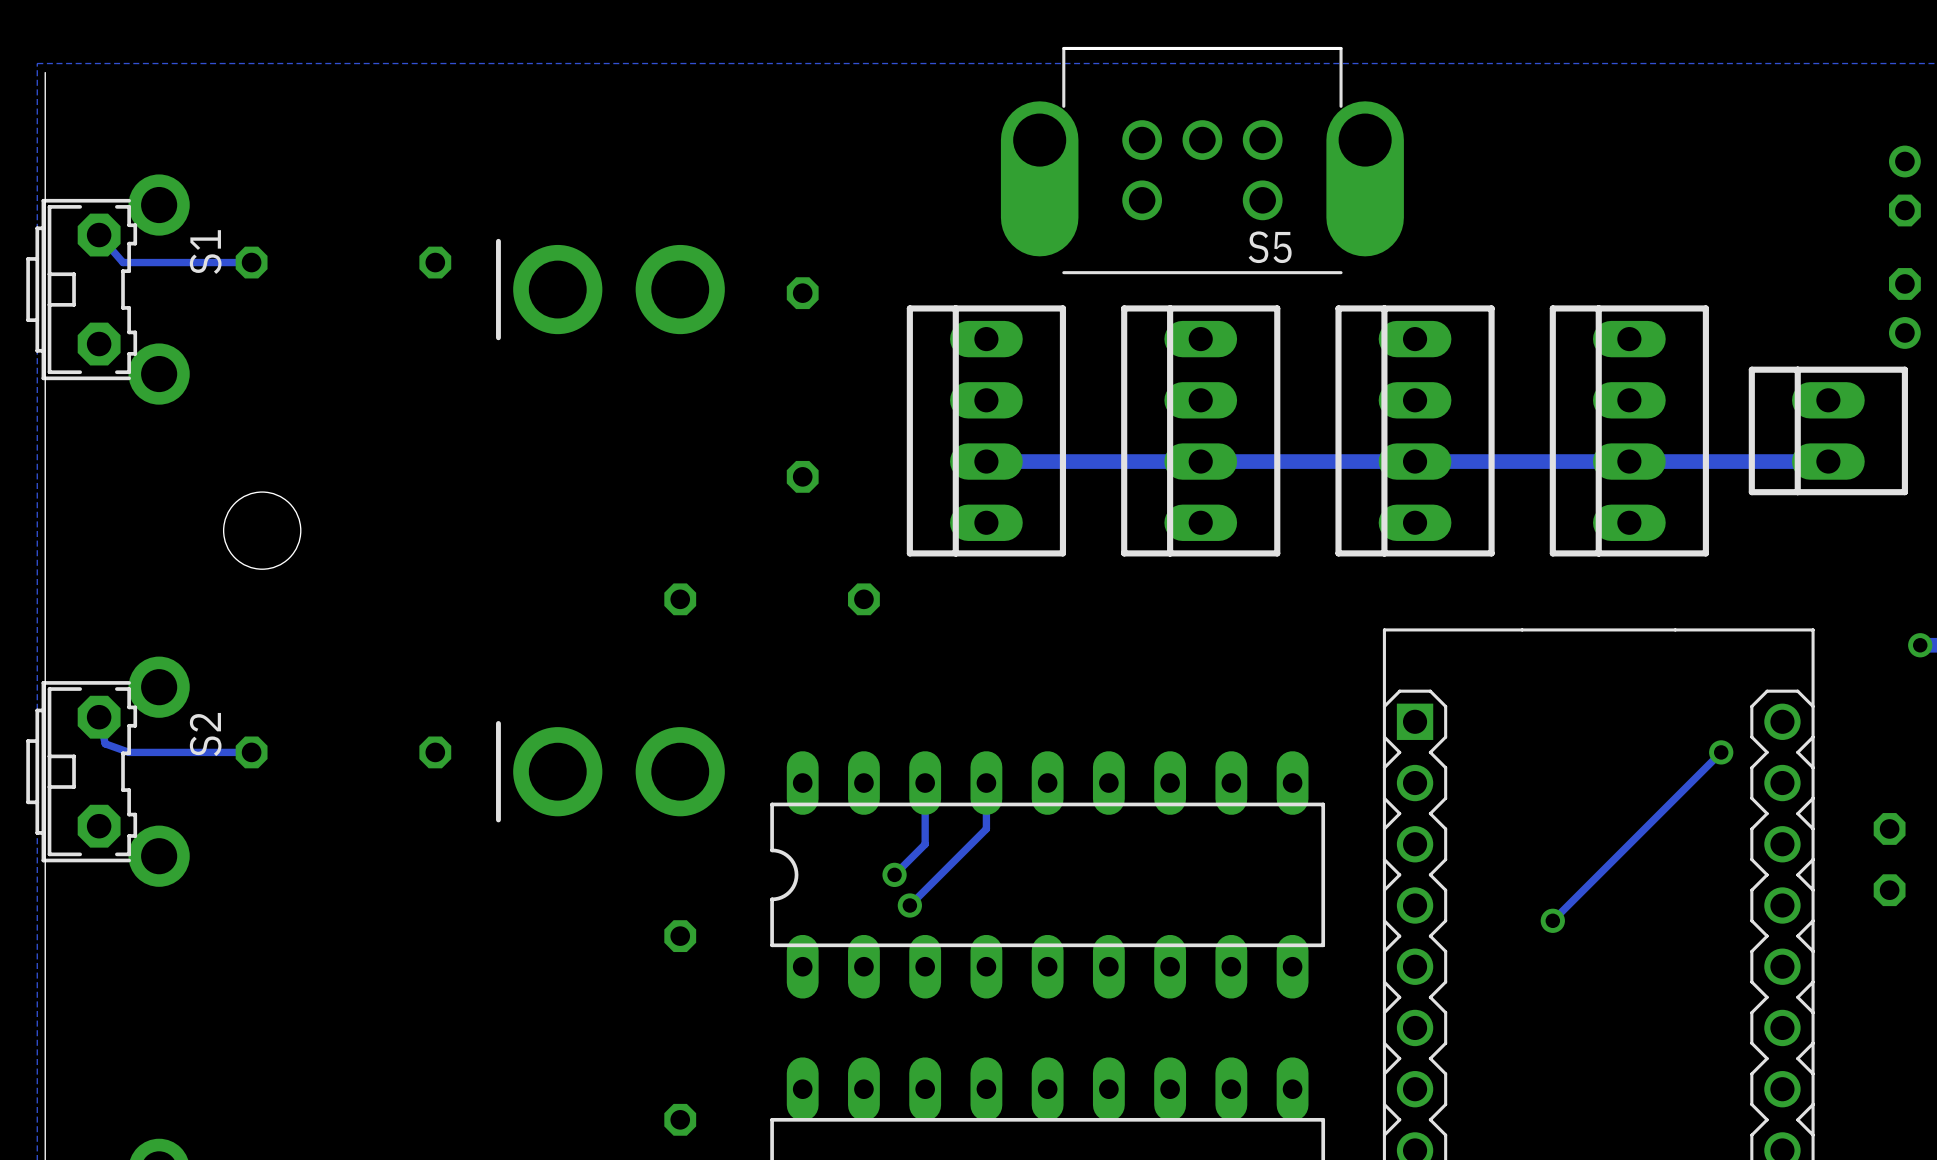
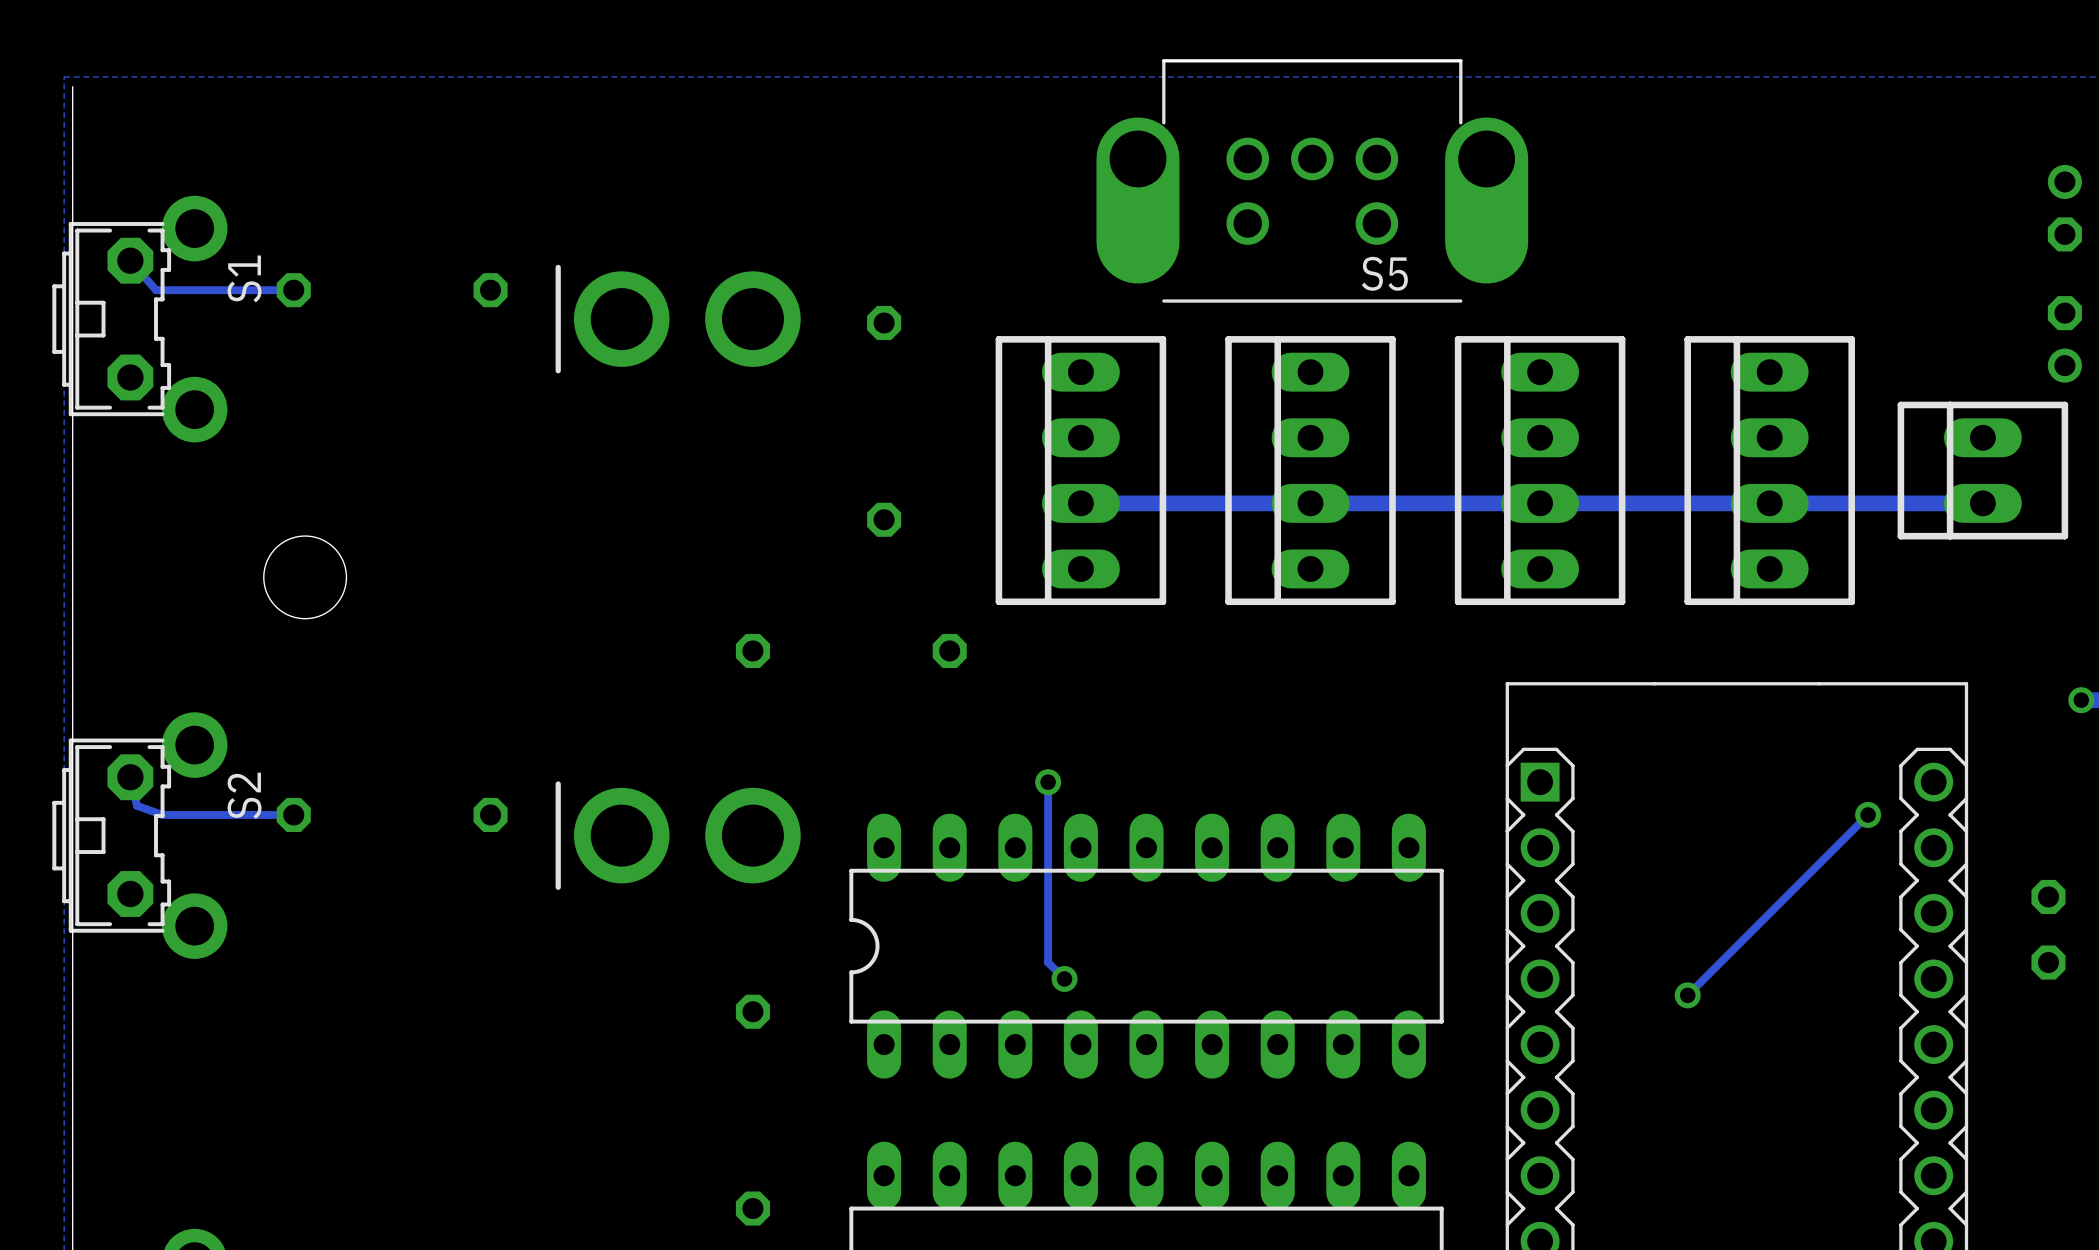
track: none -> (1048, 782) (1048, 962) (1064, 978)
via: none -> (1048, 782)
track: (925, 783) (925, 844) (894, 874) -> none
track: (986, 783) (986, 828) (909, 905) -> none
via: (894, 874) -> none
via: (909, 905) -> none
via: none -> (1064, 978)

